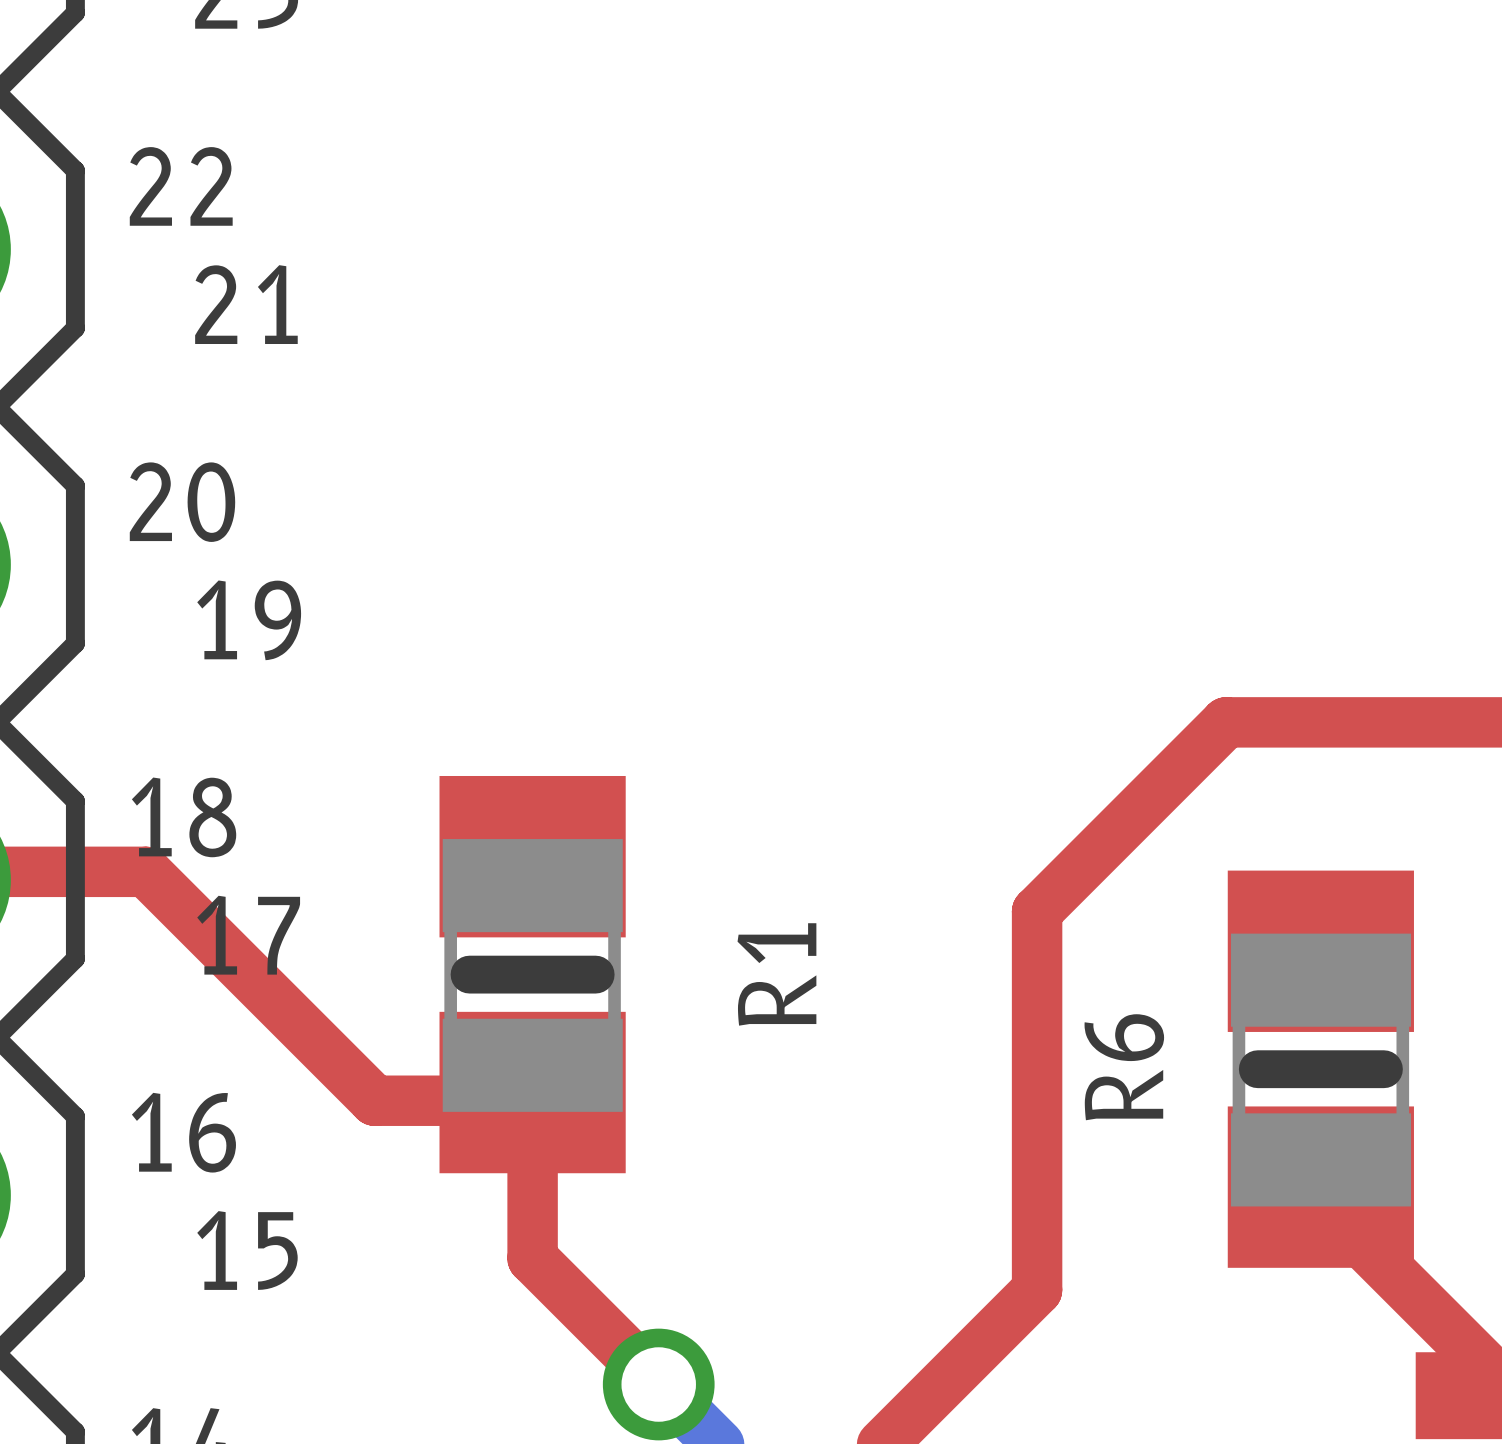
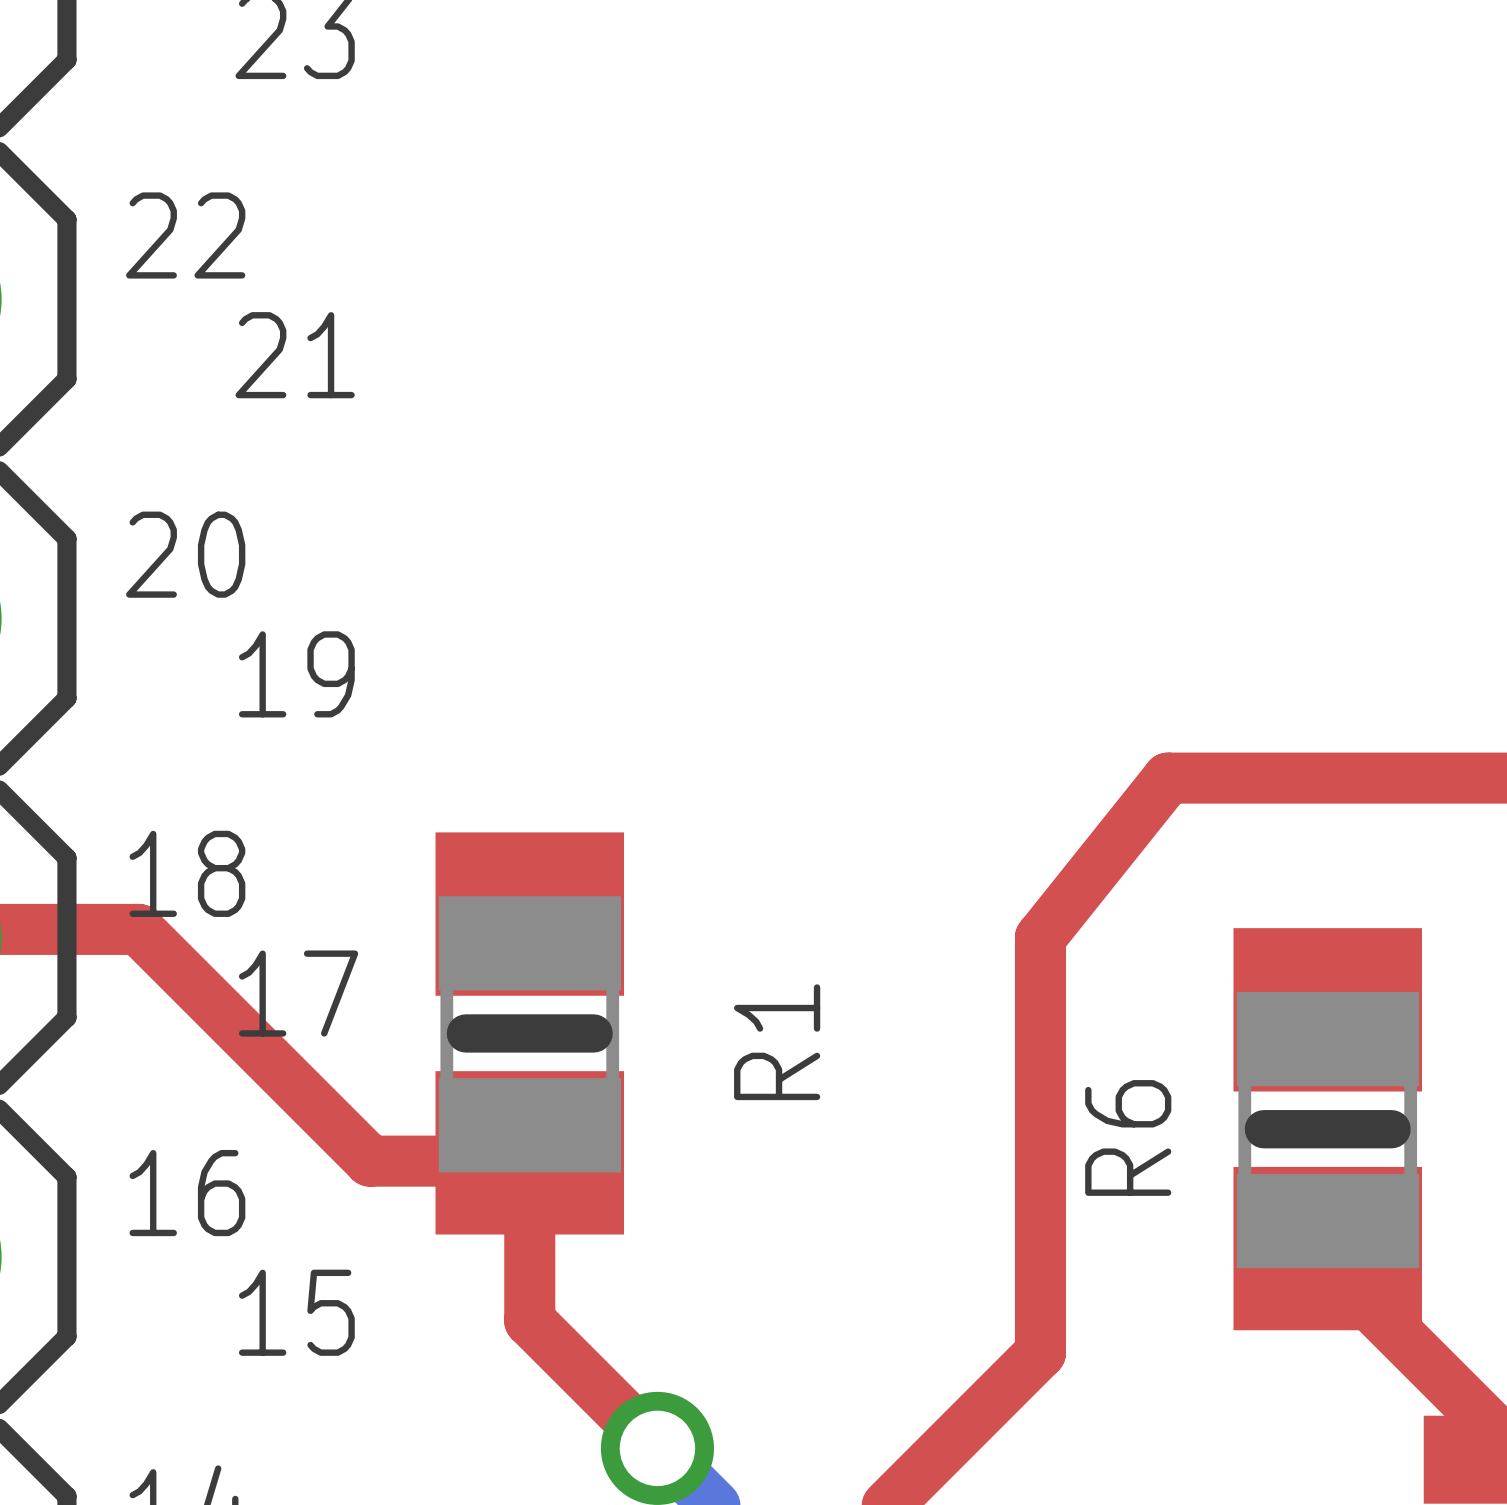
top track: (1226, 722) (1037, 911) -> (1231, 778) (1168, 778) (1040, 937) (1040, 969)

